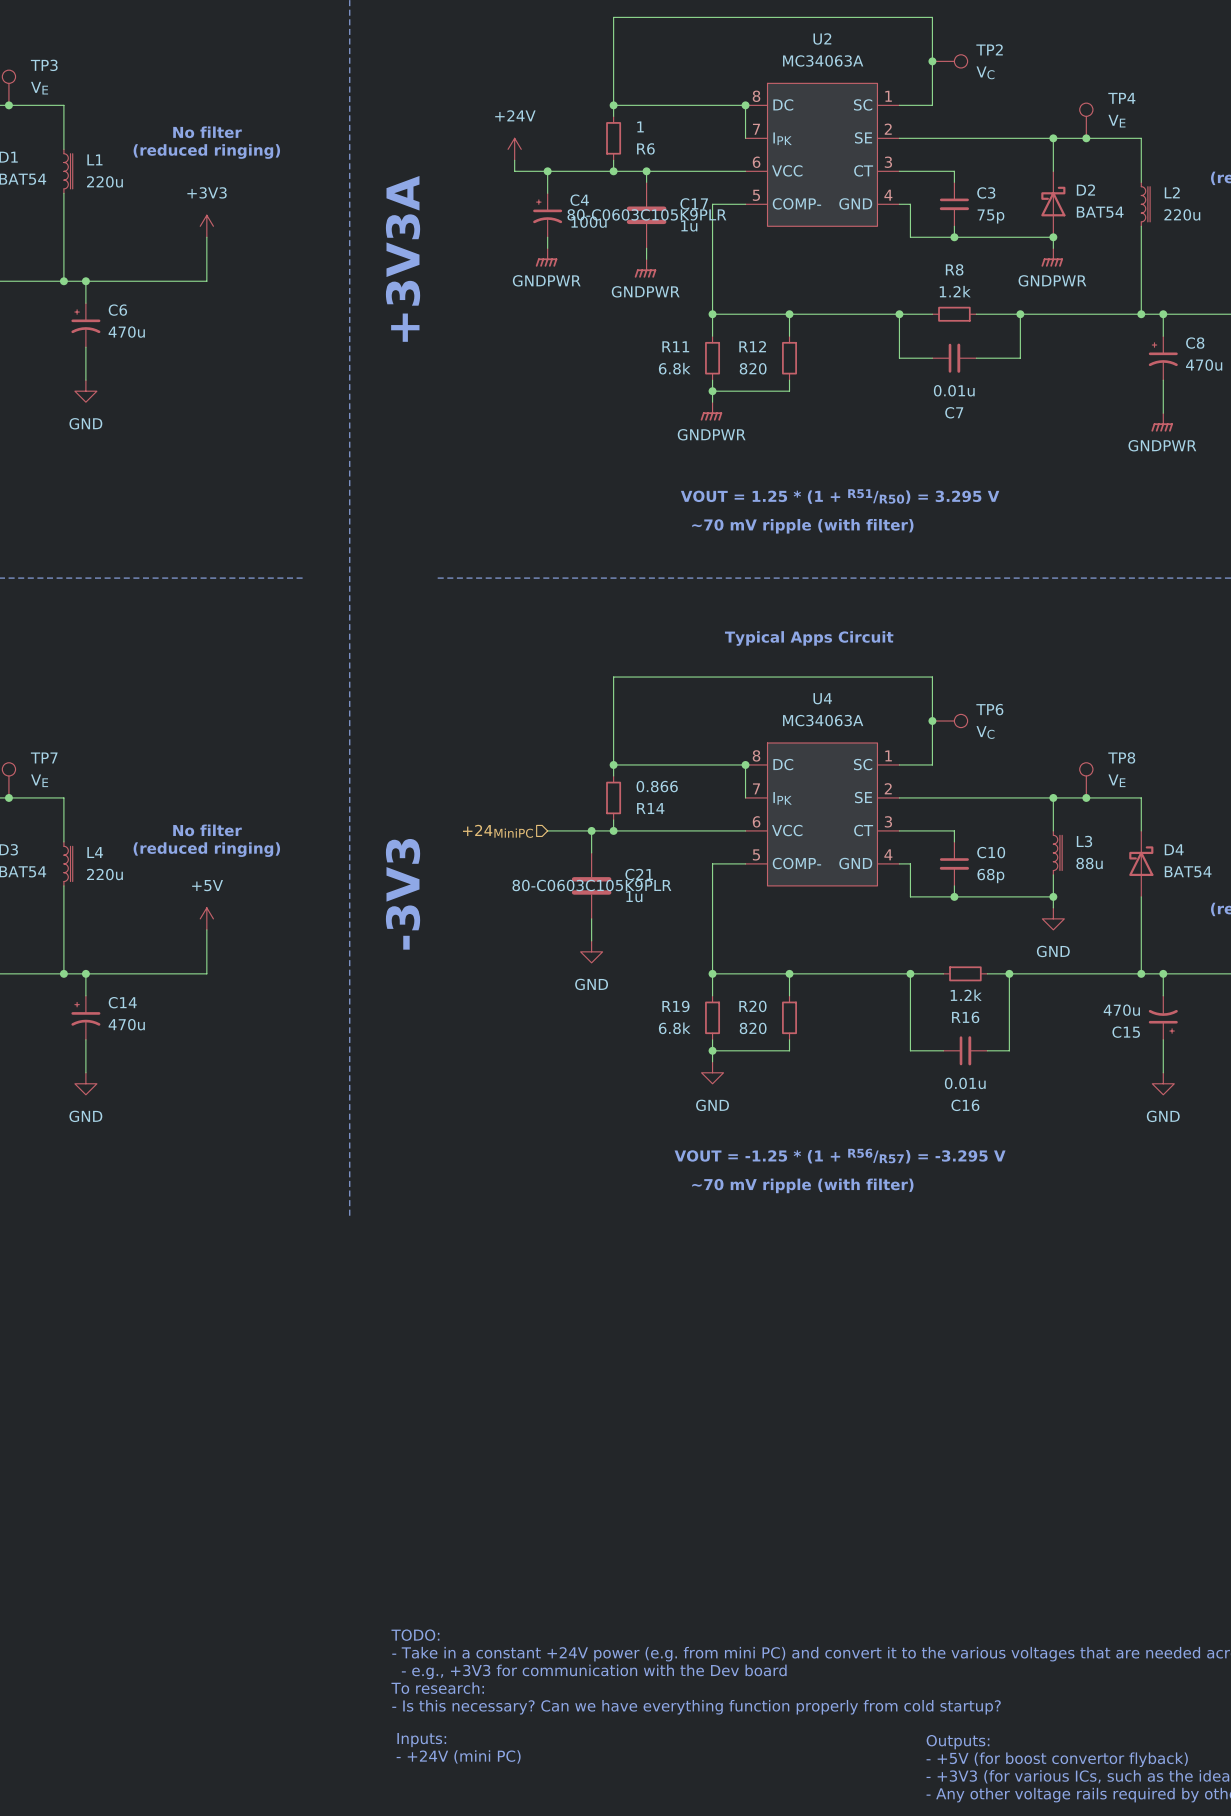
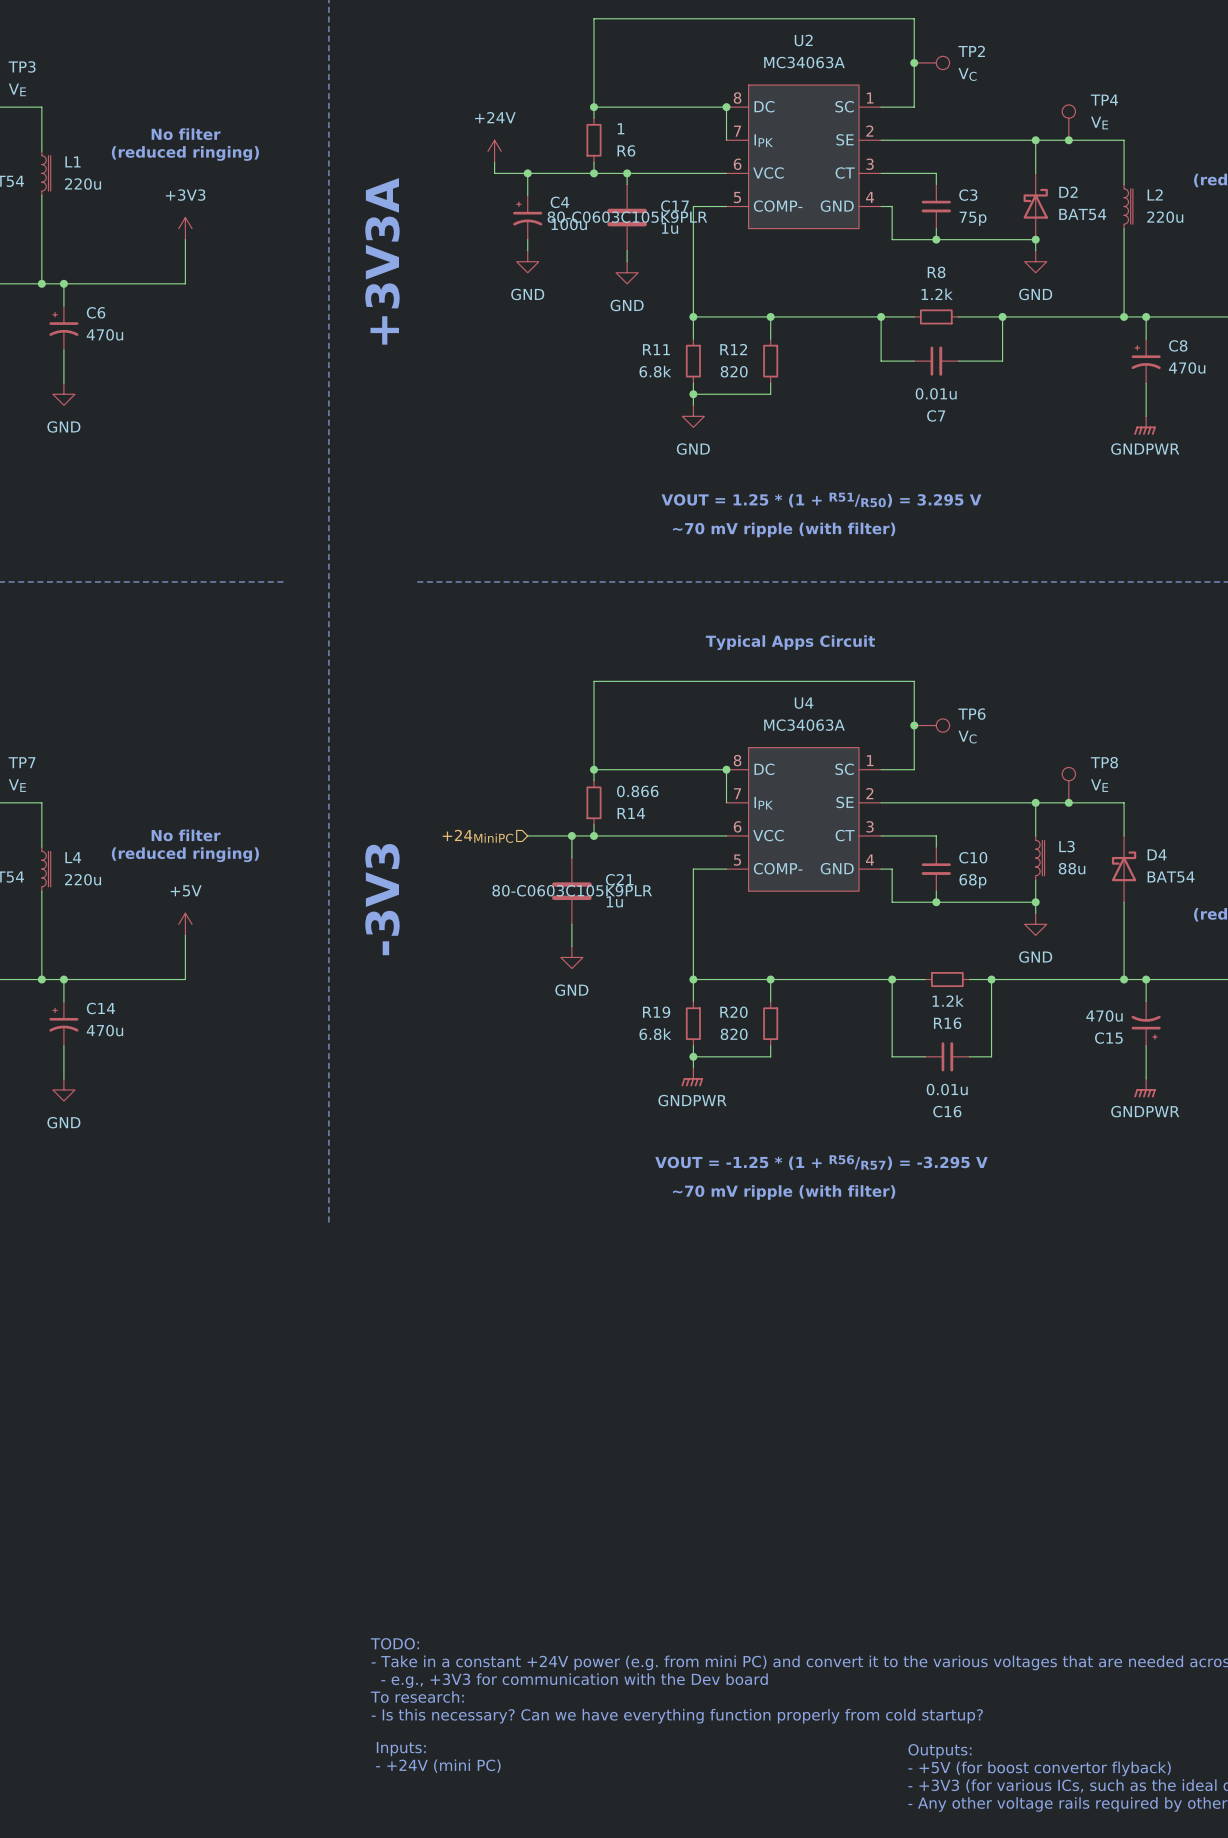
power symbol: GNDPWR (546, 257) -> GND (527, 261)
power symbol: GNDPWR (1052, 257) -> GND (1035, 261)
power symbol: GNDPWR (645, 268) -> GND (627, 272)
power symbol: GNDPWR (711, 411) -> GND (693, 416)
power symbol: GND (712, 1072) -> GNDPWR (692, 1077)
power symbol: GND (1163, 1083) -> GNDPWR (1145, 1088)

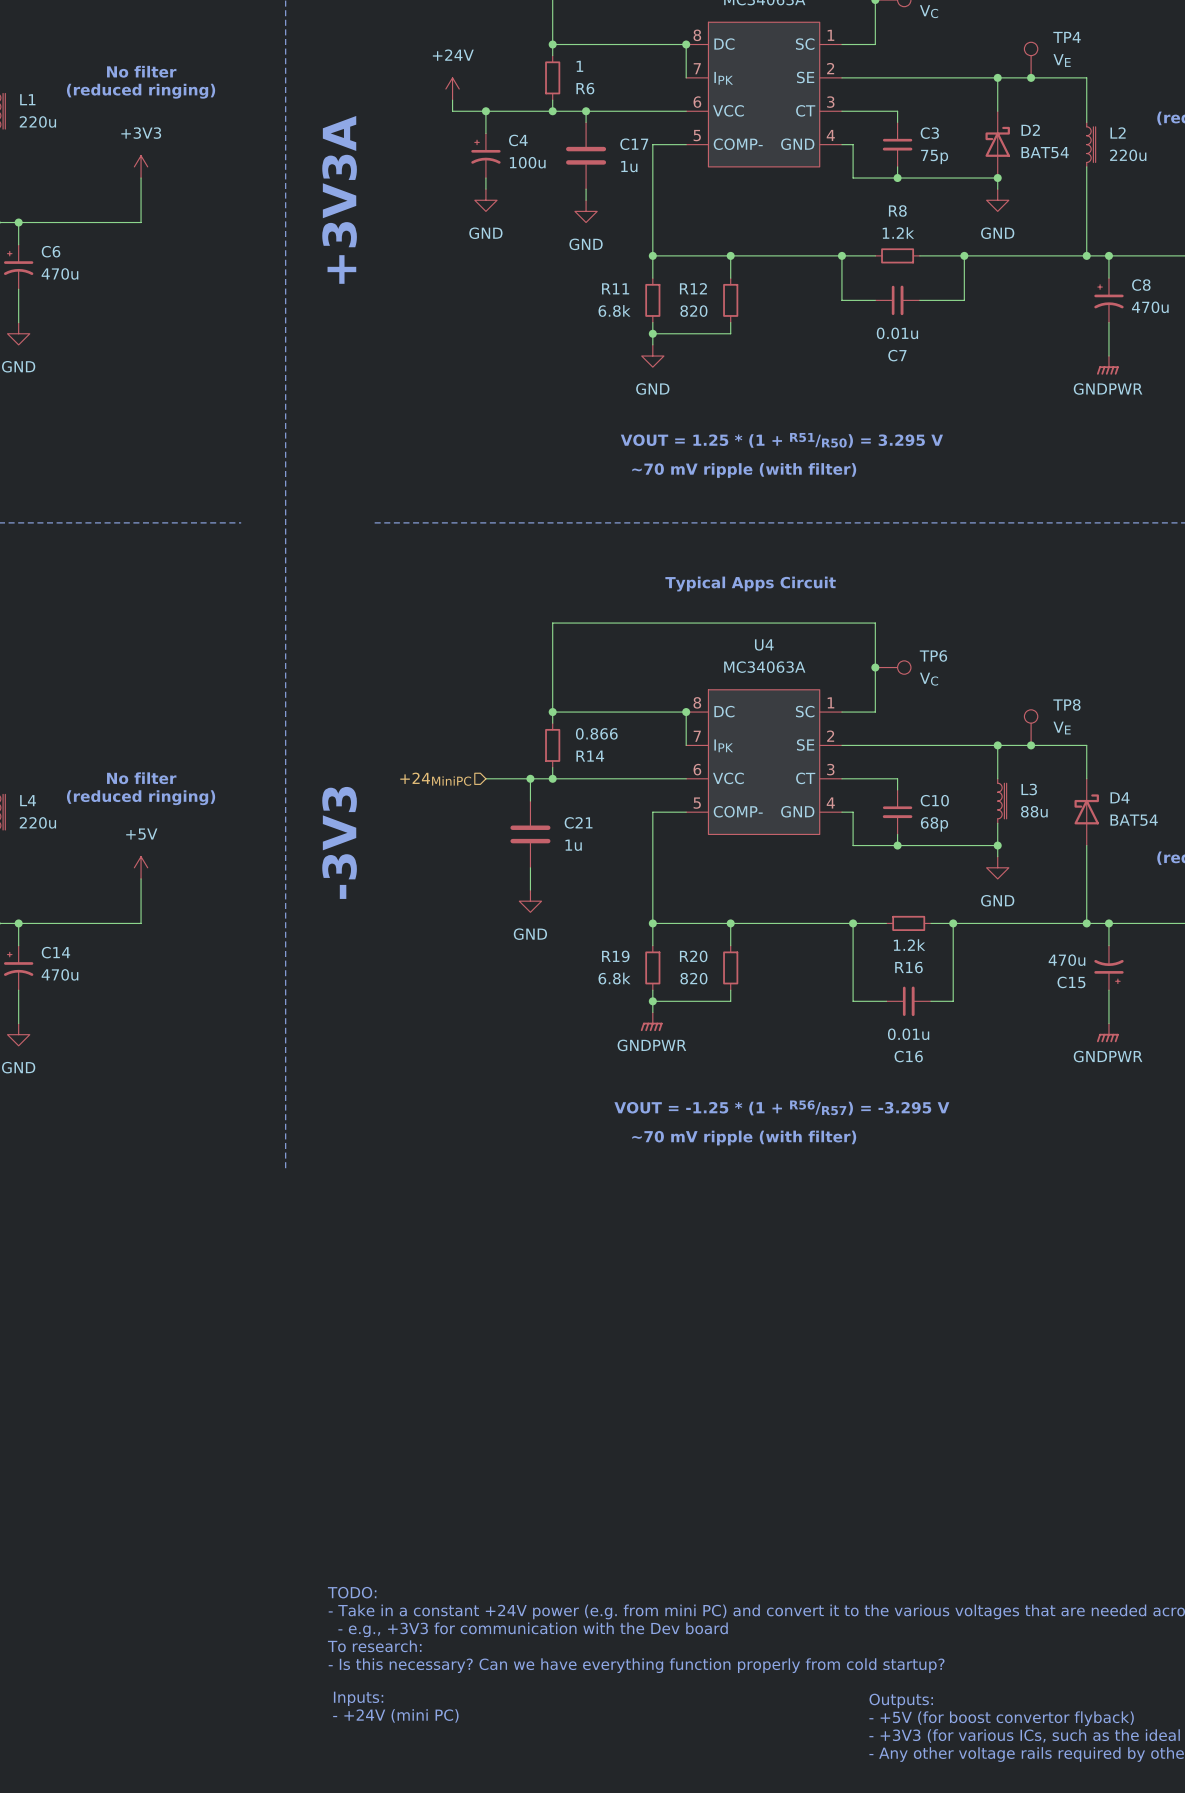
C17 text: 80-C0603C105K9PLR (627, 217) -> none
C21 text: 80-C0603C105K9PLR (572, 890) -> none

